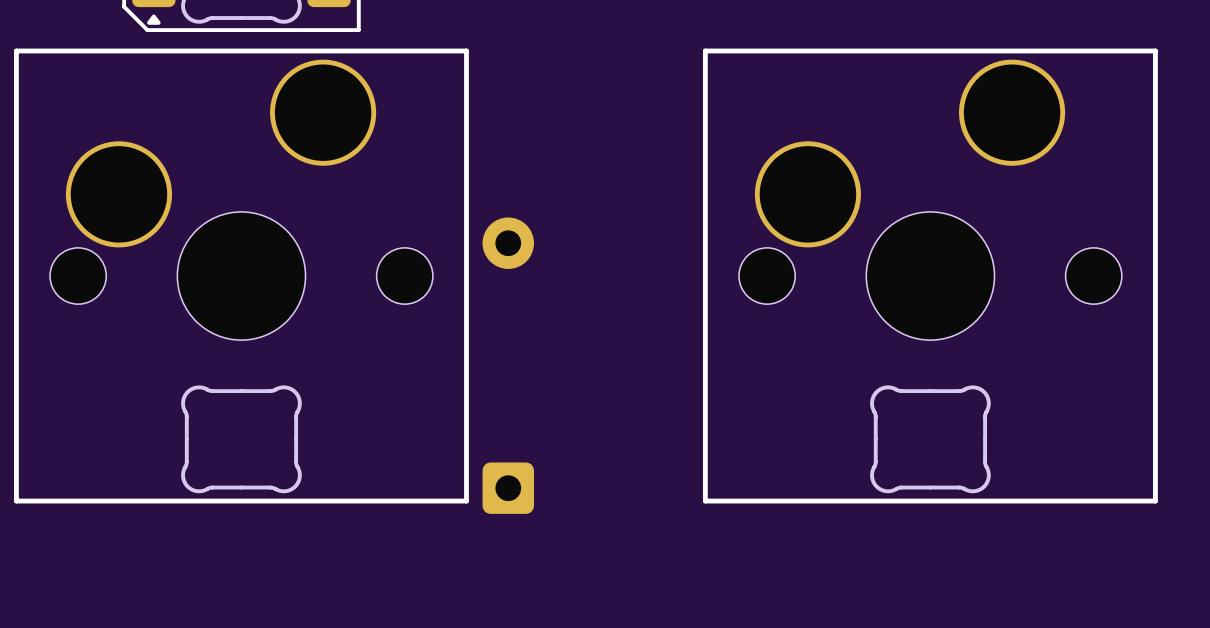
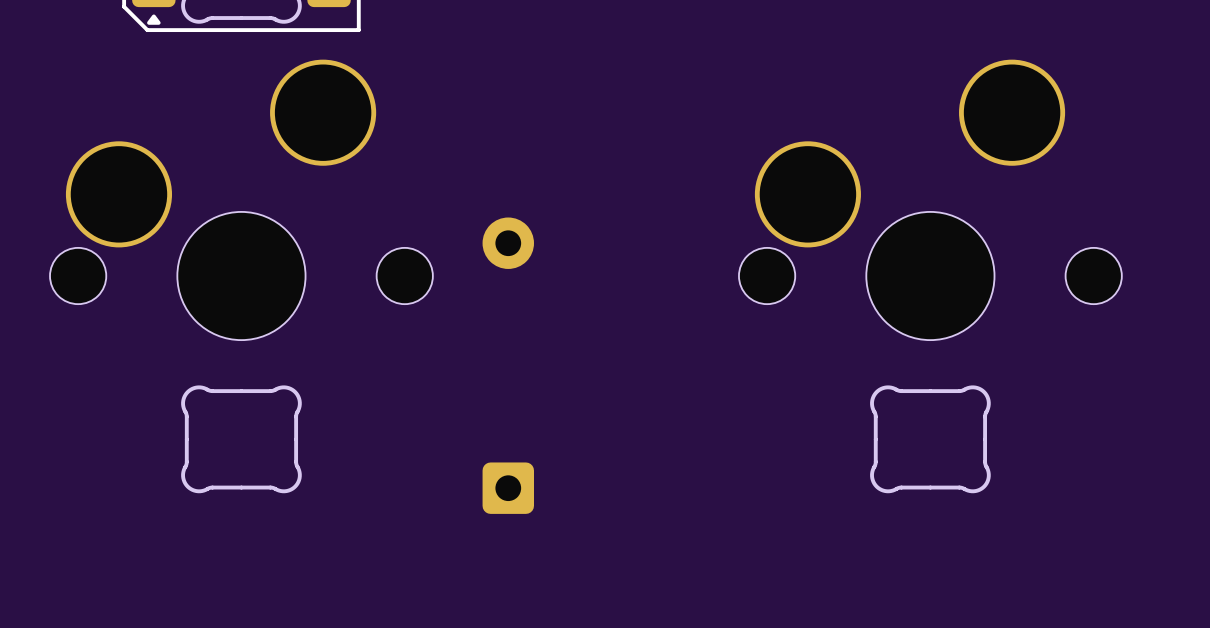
part: (241, 276) -> none
part: (930, 276) -> none

